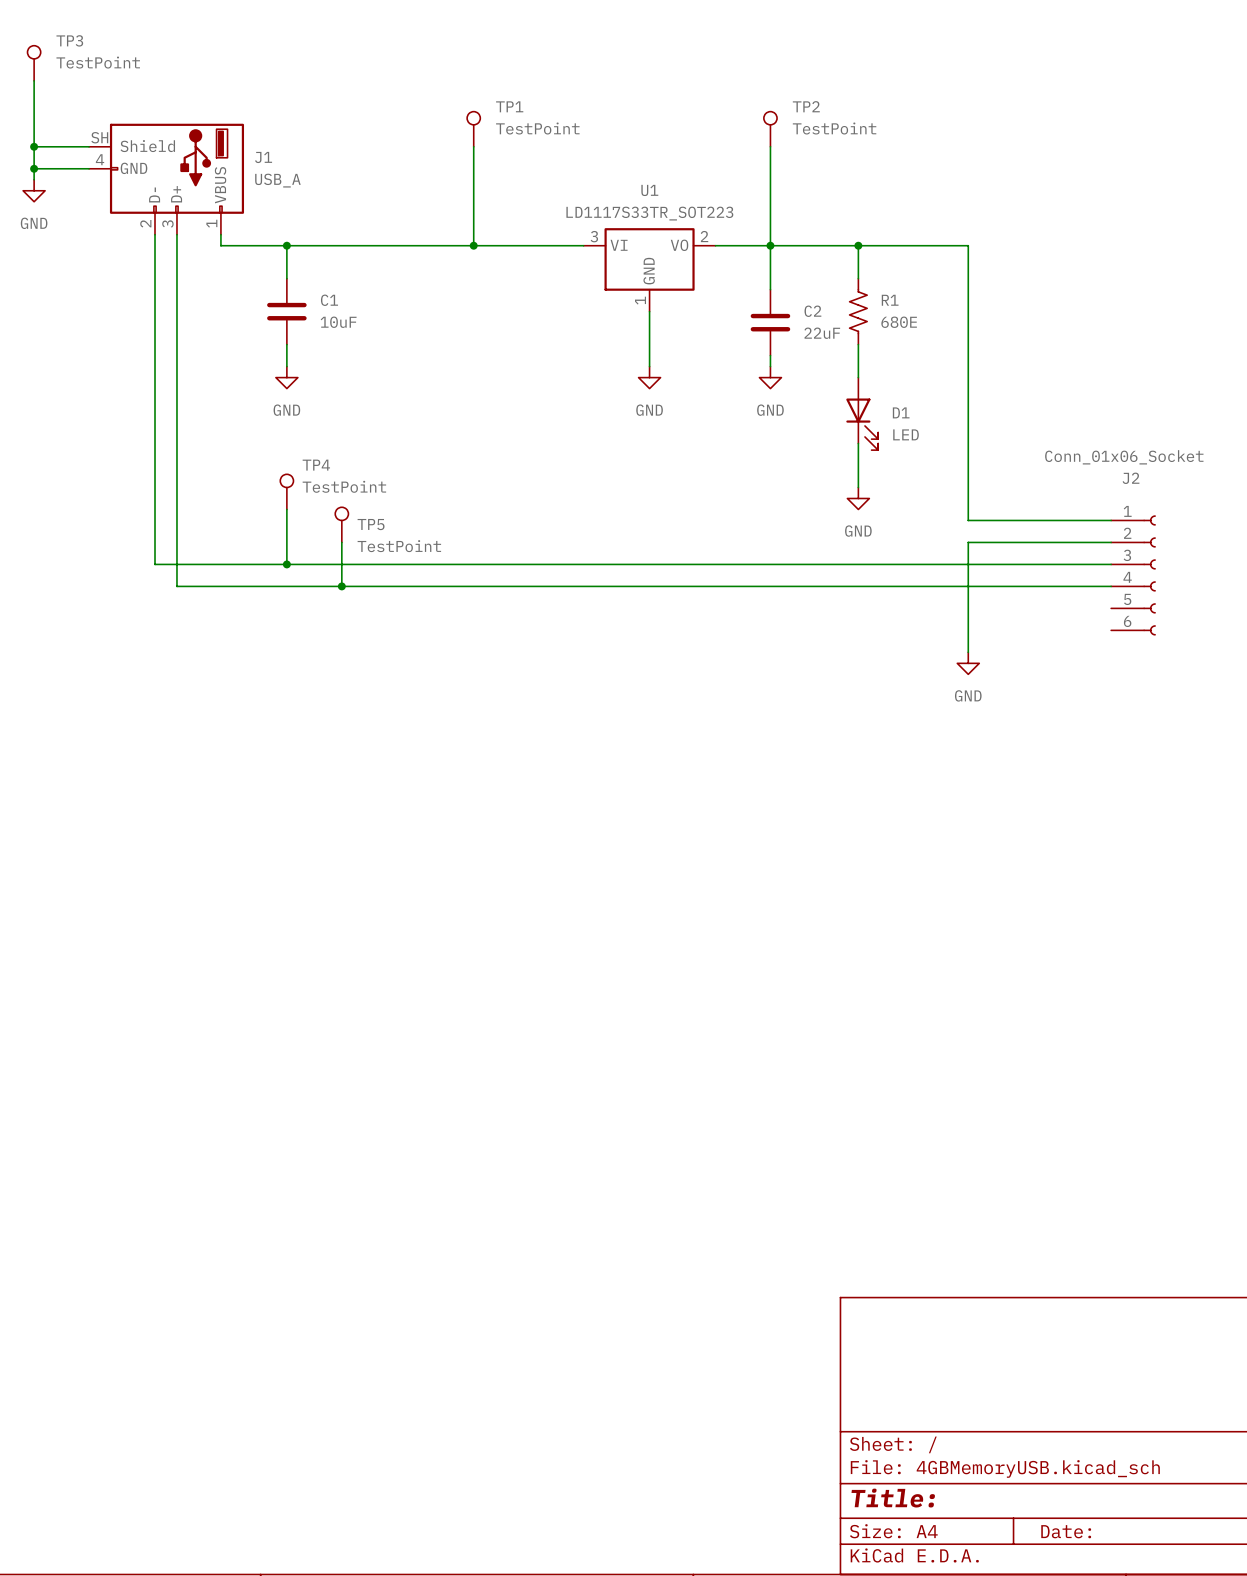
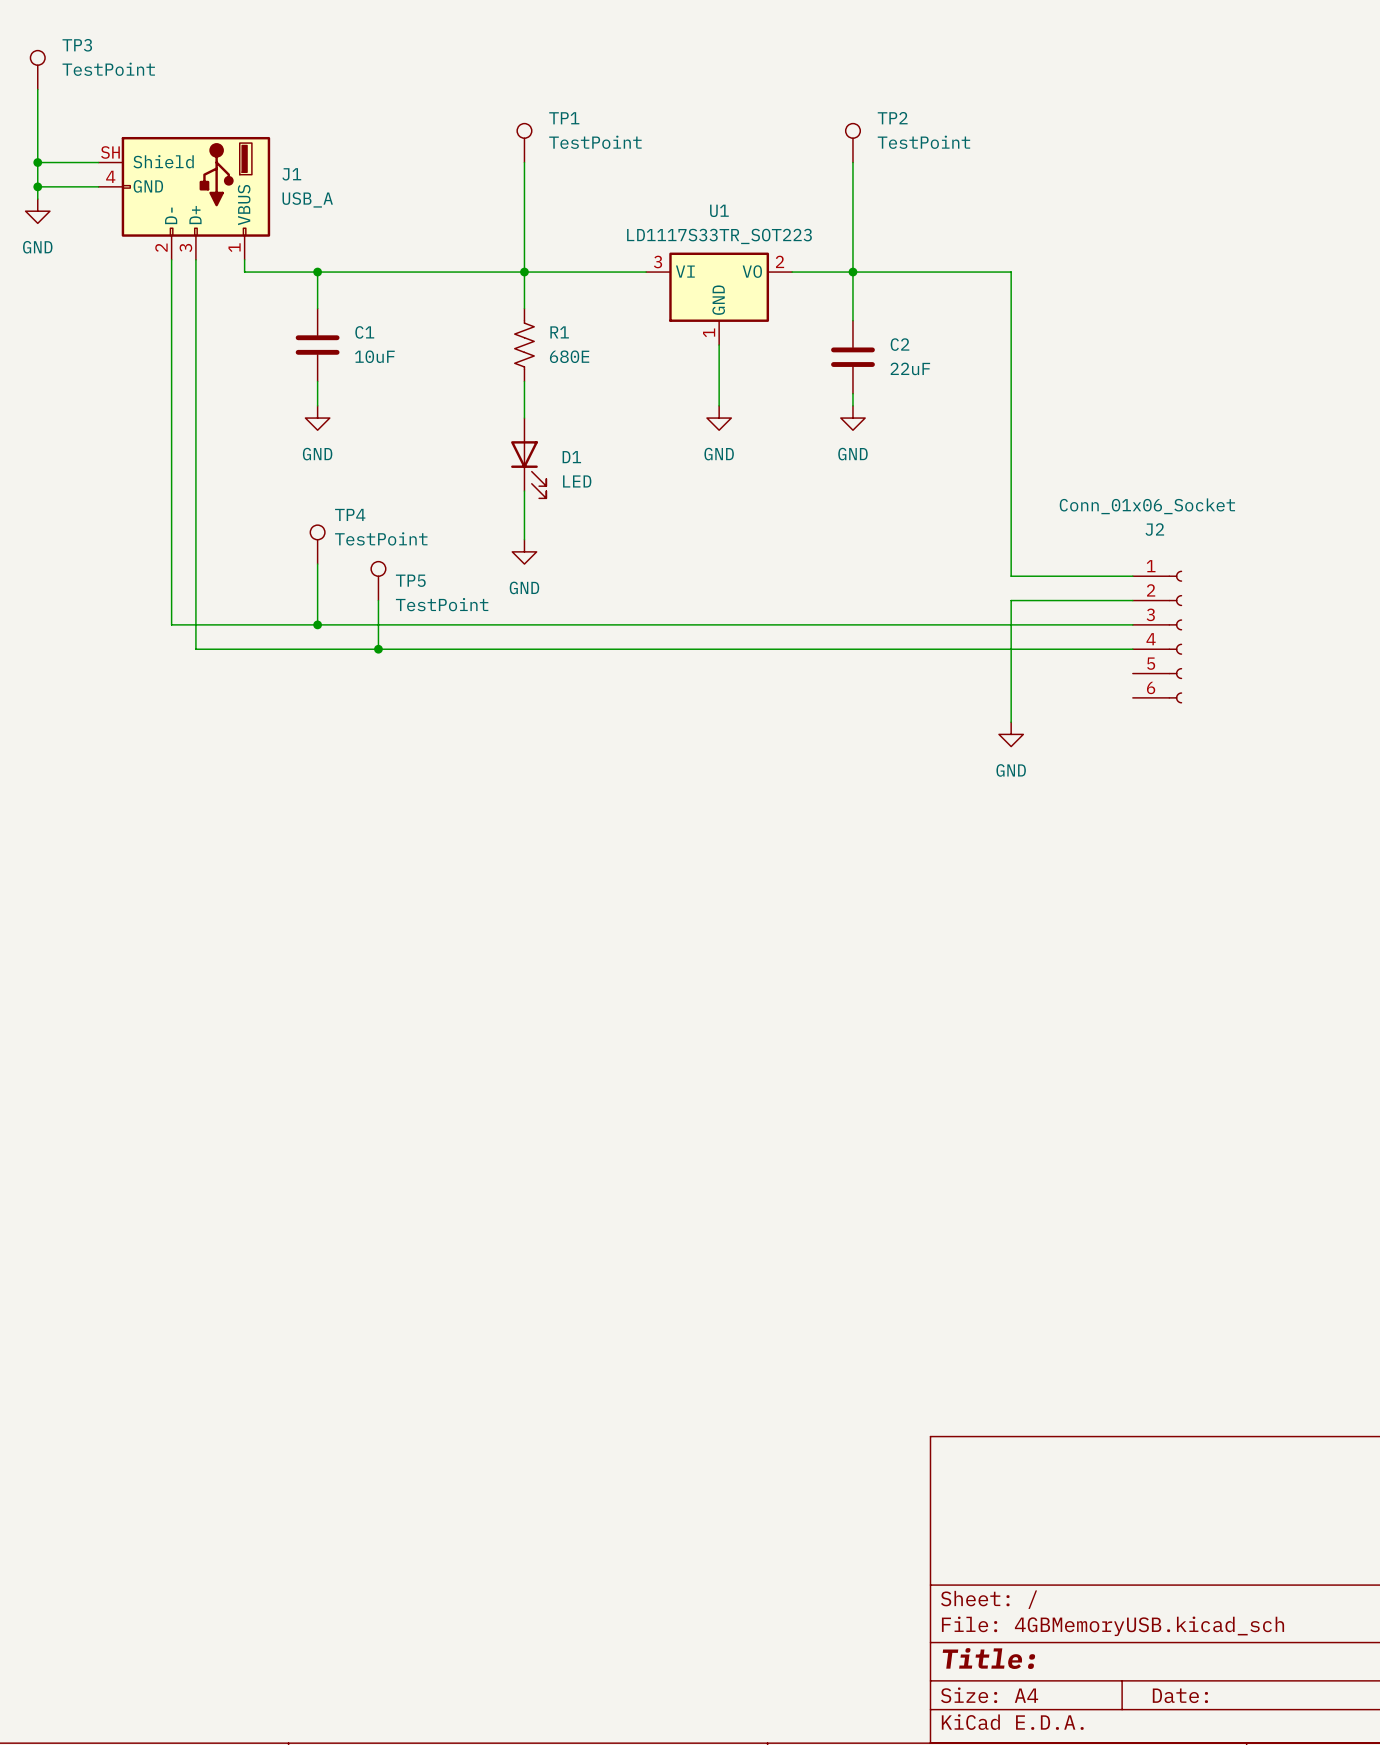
wire: none -> (524, 272) (524, 308)
wire: (858, 245) (858, 278) -> none
junction: (858, 245) -> none
wire: (913, 245) (968, 245) (968, 520) -> (1011, 272) (1011, 576) (1072, 576)
R1 position: (858, 311) -> (524, 345)
wire: none -> (524, 381) (524, 418)
wire: (858, 344) (858, 377) -> none
D1 position: (862, 413) -> (528, 458)
wire: none -> (524, 491) (524, 539)
wire: (858, 443) (858, 487) -> none
power symbol: none -> GND (524, 551)
power symbol: GND (858, 498) -> none
wire: (1023, 520) (1111, 520) -> none
wire: (968, 542) (968, 652) -> (1072, 600) (1011, 600) (1011, 722)
wire: (1023, 542) (1111, 542) -> none
wire: (1023, 564) (1111, 564) -> none
J2 position: (1133, 575) -> (1157, 637)
wire: (1023, 586) (1111, 586) -> none
power symbol position: GND (968, 663) -> GND (1011, 734)

